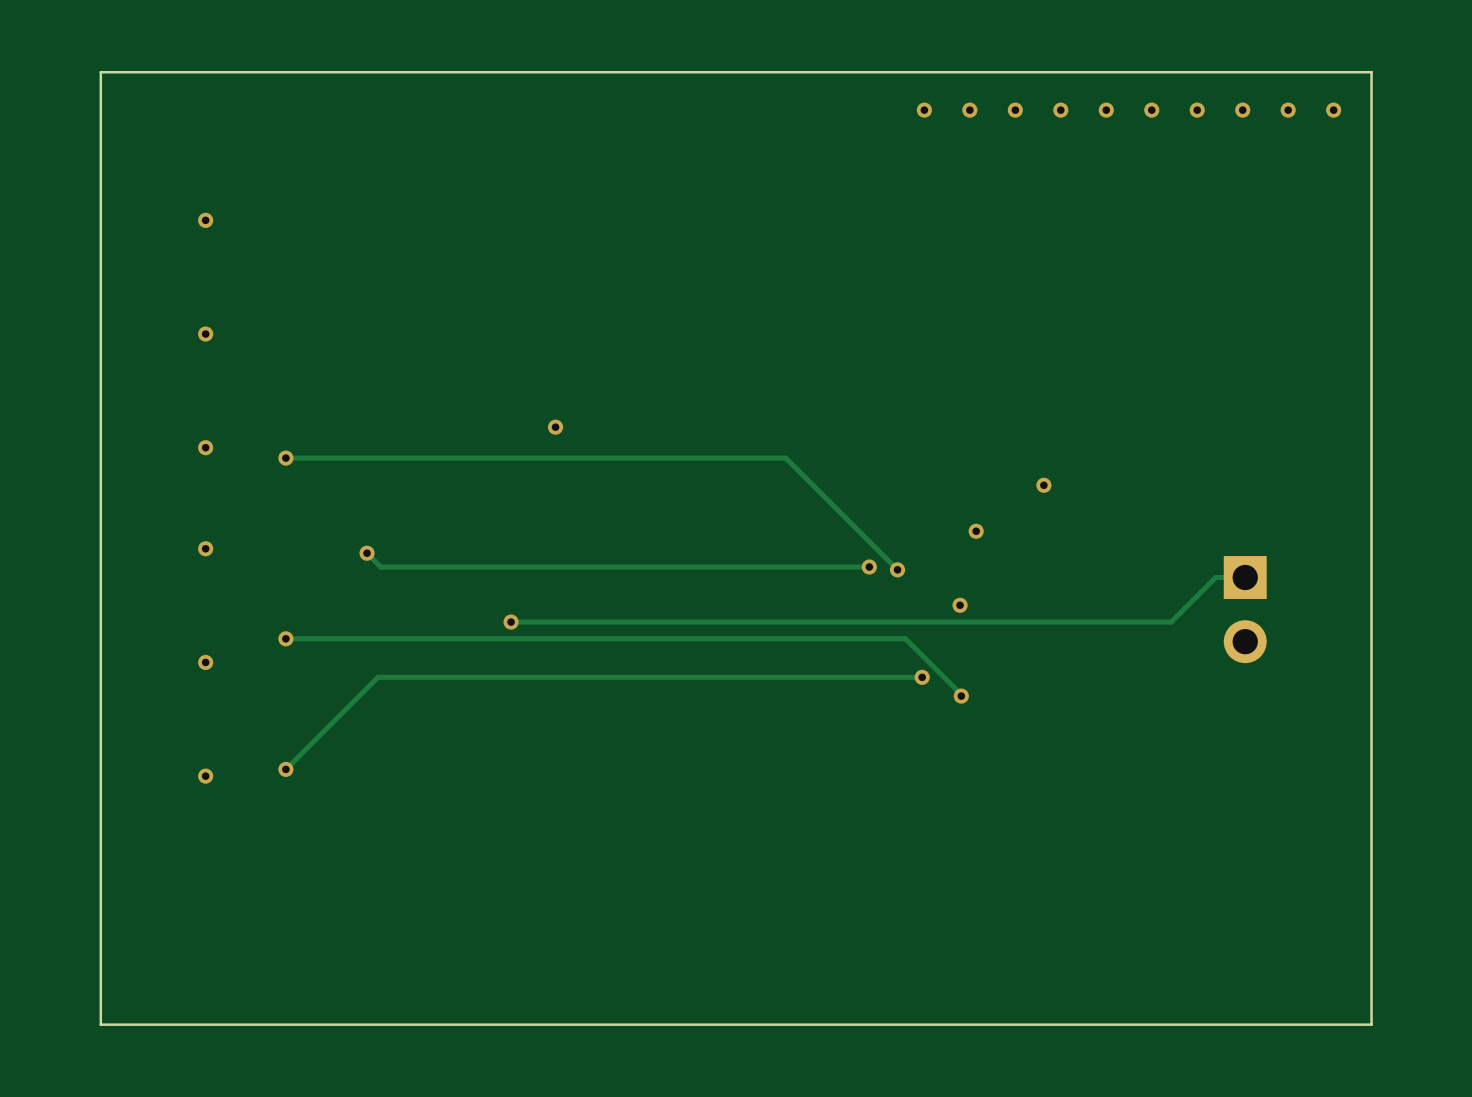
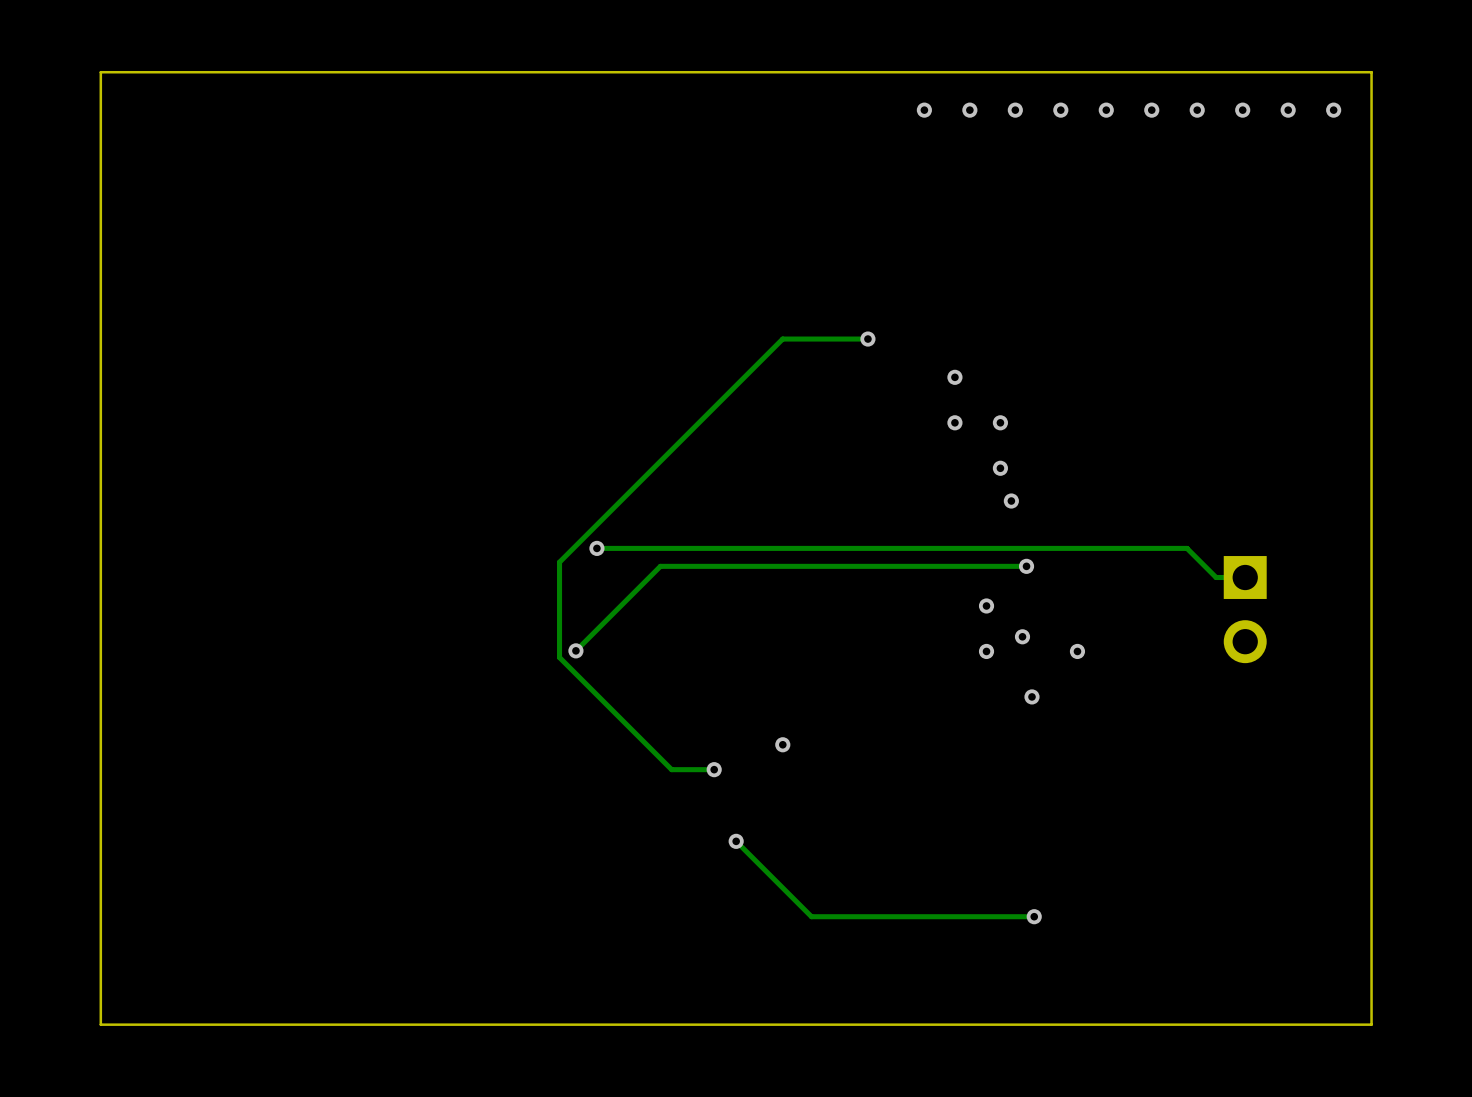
via: (205, 220) -> none
via: (205, 334) -> none
track: none -> (867, 339) (782, 339) (559, 562) (559, 657) (671, 769) (714, 769)
via: none -> (867, 339)
via: none -> (954, 377)
via: none -> (954, 422)
via: none -> (1000, 422)
via: (555, 427) -> none
via: (205, 447) -> none
track: (285, 458) (785, 458) (897, 569) -> none
via: (285, 458) -> none
via: none -> (1000, 468)
via: (1043, 485) -> none
via: none -> (1011, 501)
via: (976, 531) -> none
via: (205, 548) -> none
via: none -> (596, 548)
track: (367, 553) (380, 567) (869, 567) -> none
via: (367, 553) -> none
track: none -> (1026, 566) (660, 566) (575, 650)
via: none -> (1026, 566)
via: (869, 567) -> none
via: (897, 569) -> none
track: (1215, 577) (1171, 622) (511, 622) -> (1216, 577) (1187, 548) (596, 548)
via: (960, 605) -> none
via: none -> (986, 605)
via: (511, 622) -> none
via: none -> (1022, 636)
track: (285, 638) (905, 638) (961, 696) -> none
via: (285, 638) -> none
via: none -> (575, 650)
via: none -> (986, 651)
via: none -> (1077, 651)
via: (205, 662) -> none
track: (922, 677) (377, 677) (285, 769) -> none
via: (922, 677) -> none
via: (961, 696) -> none
via: none -> (1031, 696)
via: none -> (782, 744)
via: (285, 769) -> none
via: none -> (714, 769)
via: (205, 776) -> none
track: none -> (736, 841) (811, 916) (1034, 916)
via: none -> (736, 841)
via: none -> (1034, 916)

